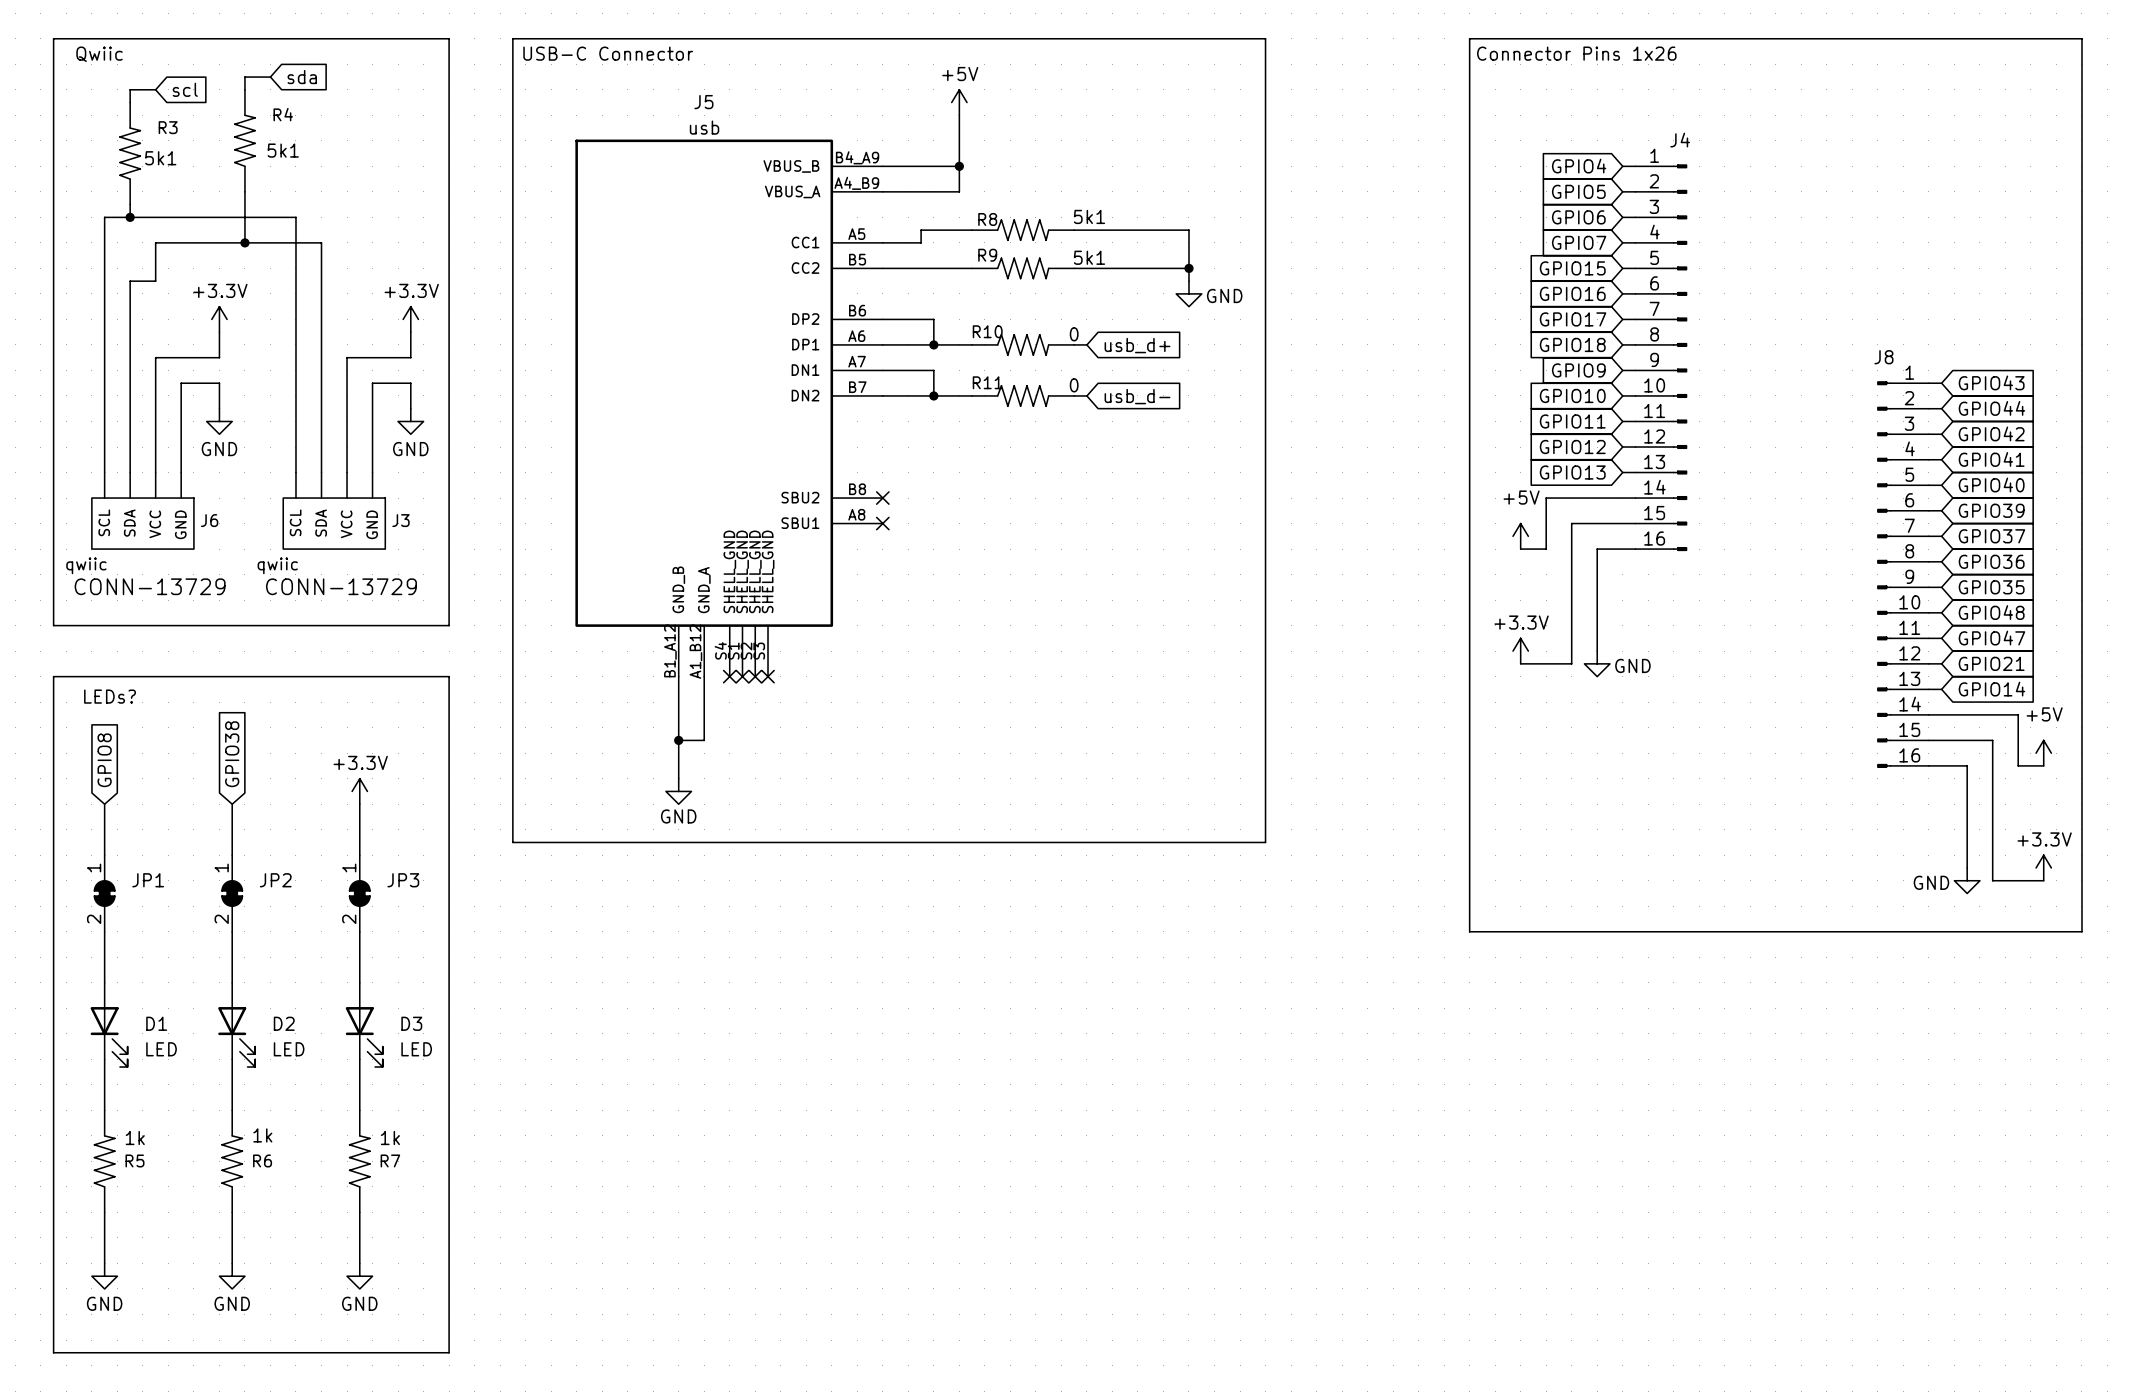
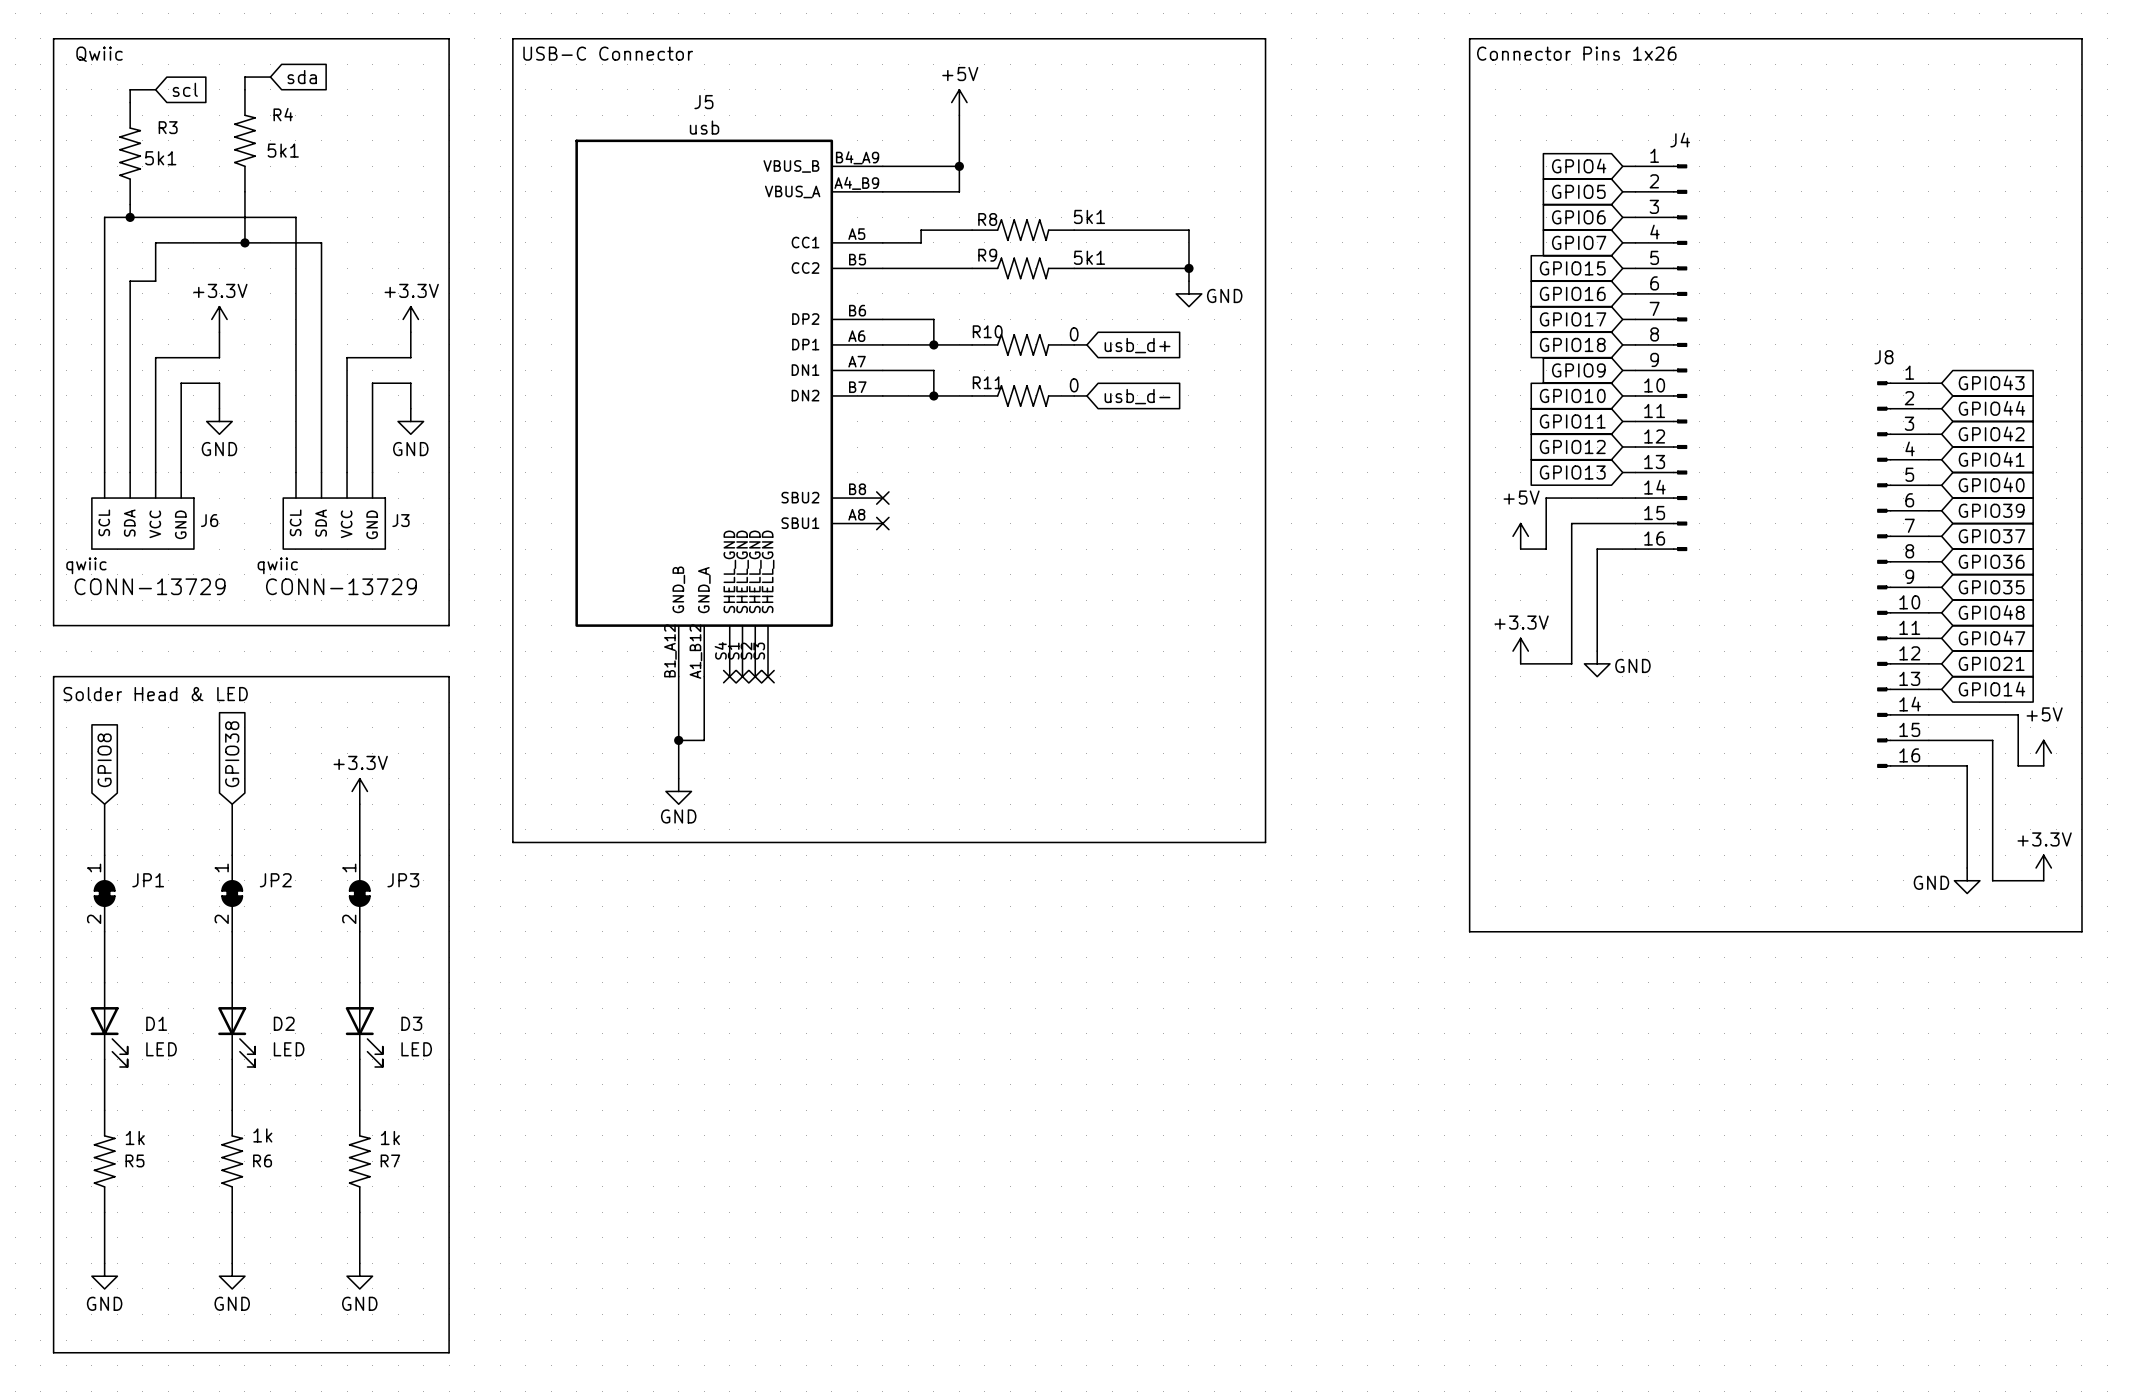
text: none -> Solder Head & LED (155, 694)
text: LEDs? (110, 696) -> none

